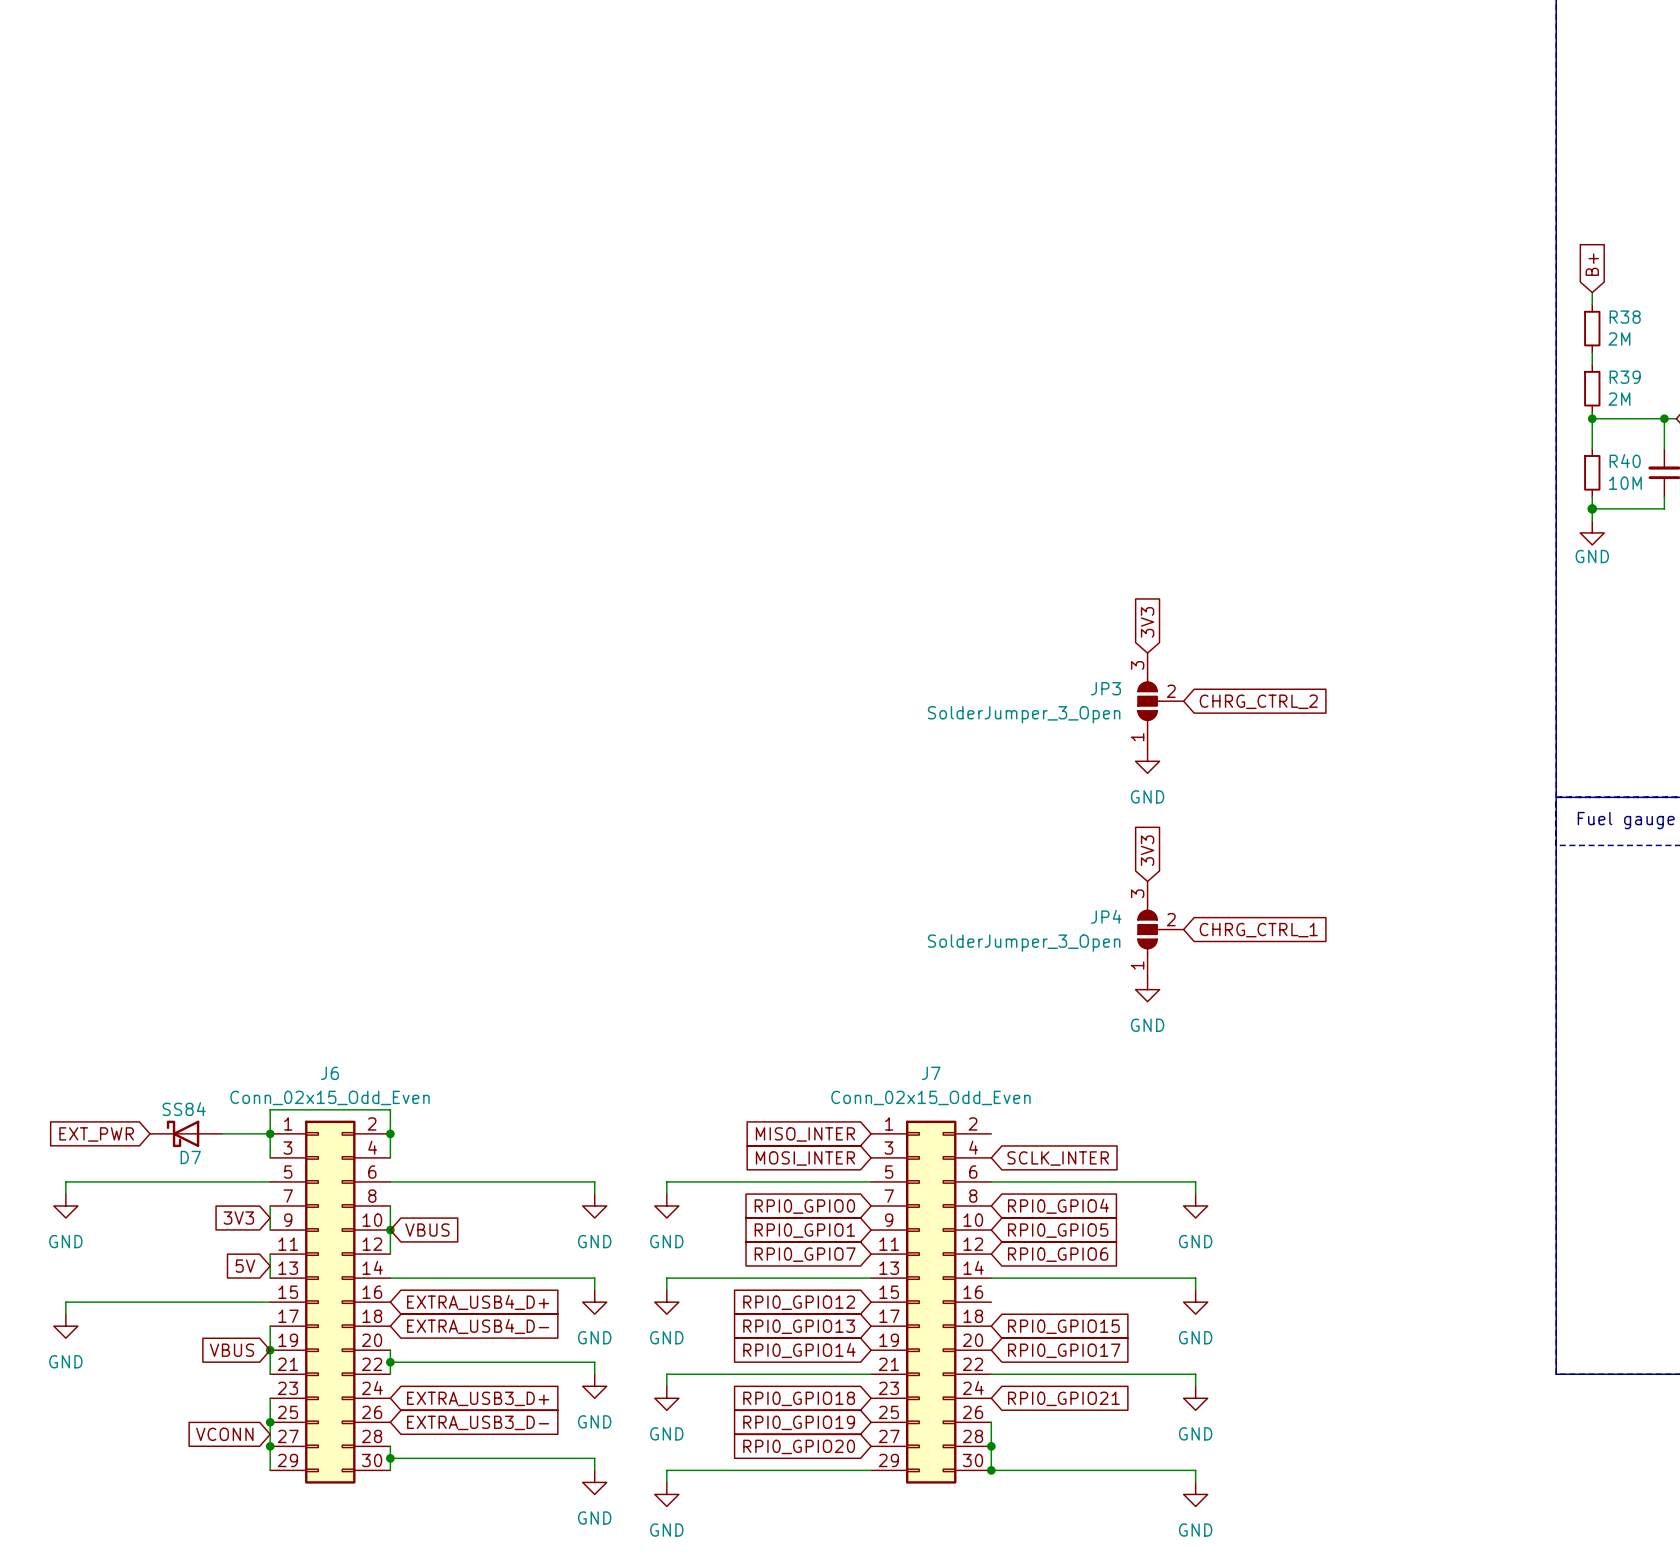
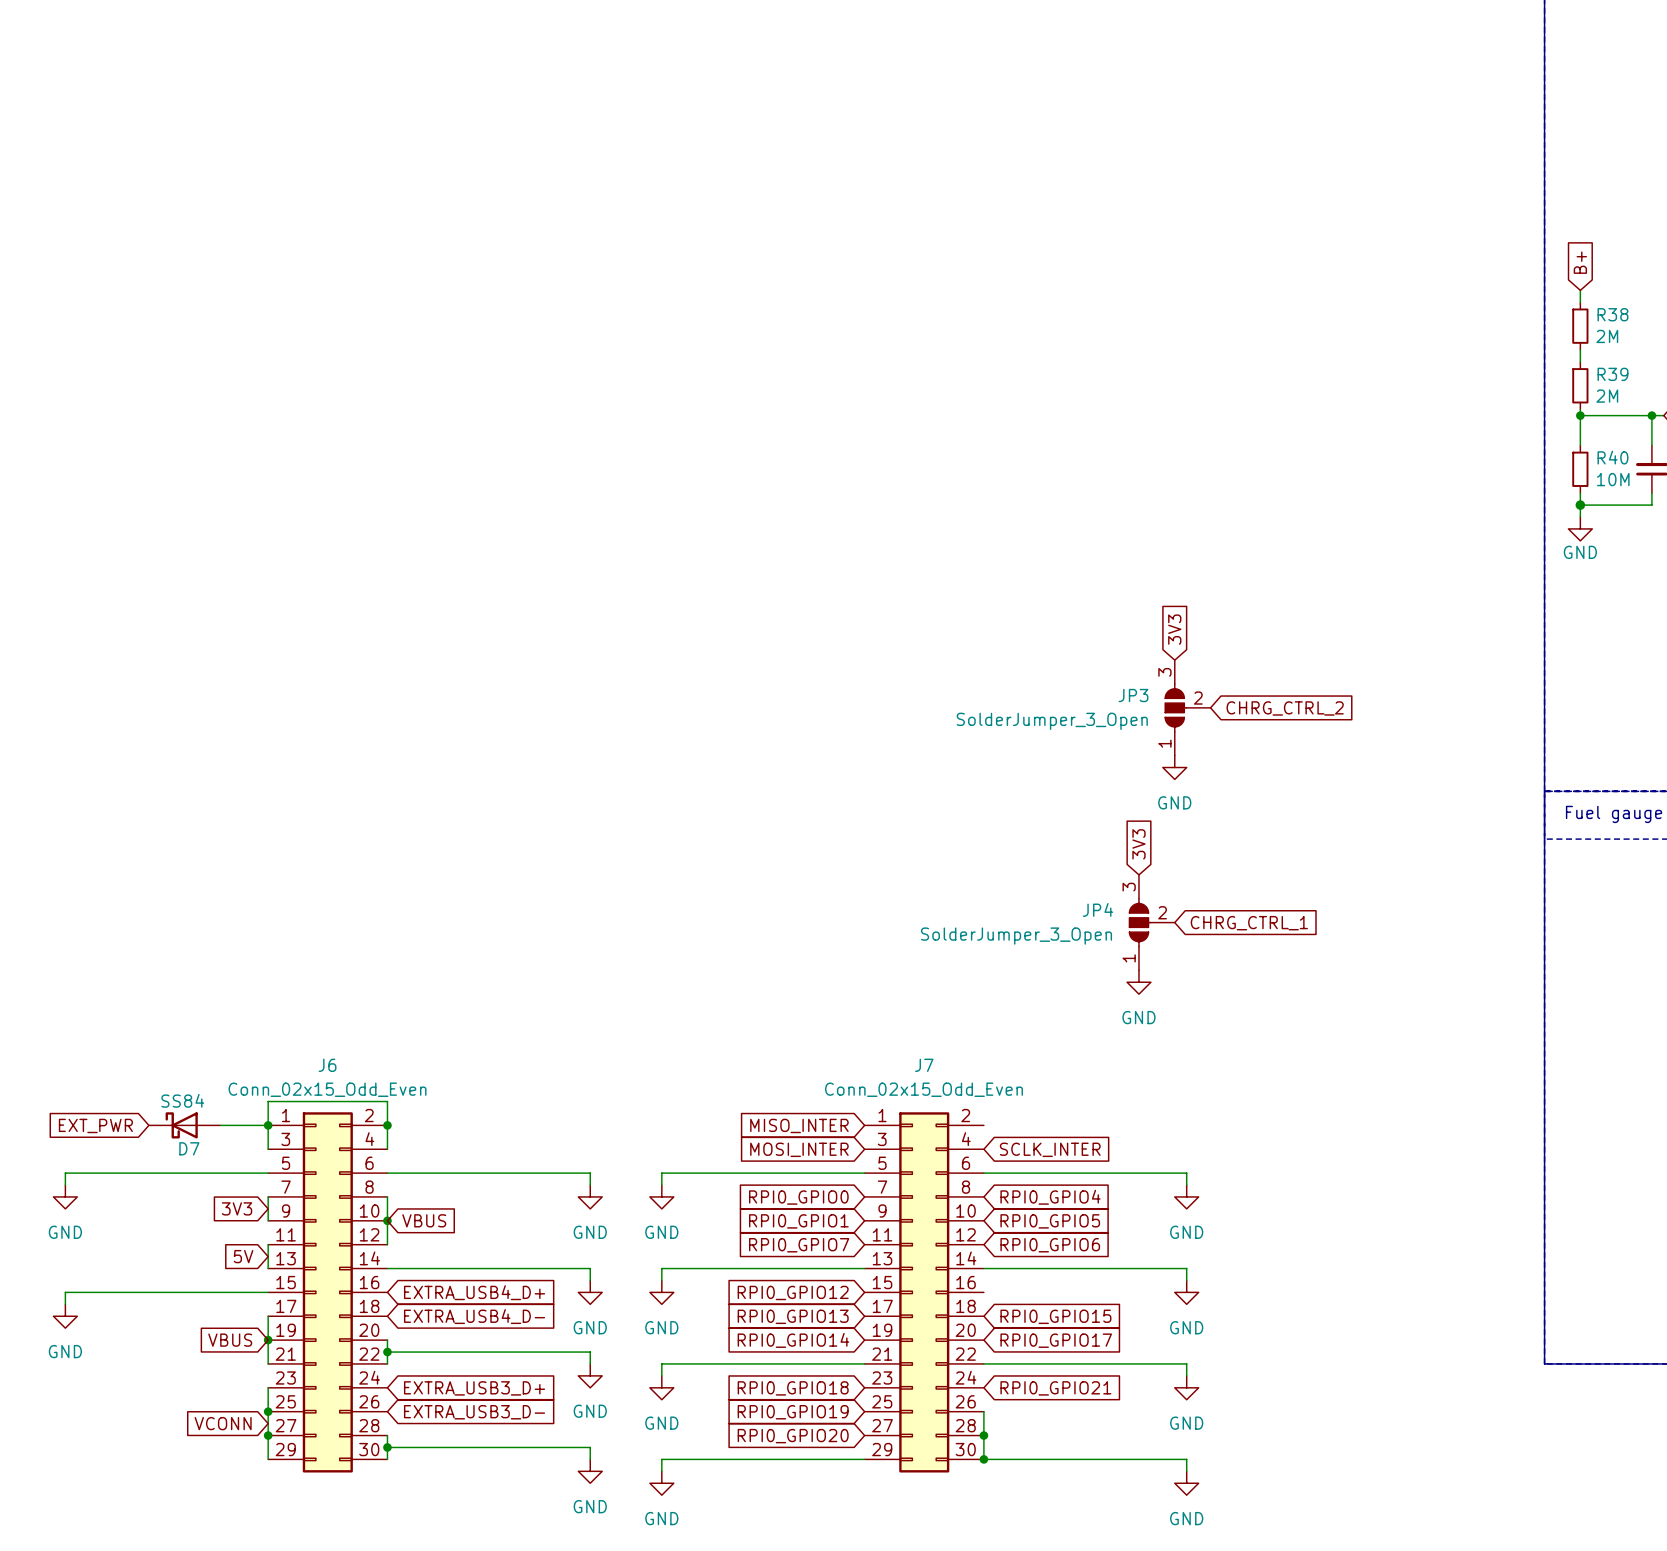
global label position: 3V3 (1147, 622) -> 3V3 (1174, 629)
JP3 position: (1160, 701) -> (1187, 707)
global label position: CHRG_CTRL_2 (1258, 701) -> CHRG_CTRL_2 (1285, 708)
power symbol position: GND (1147, 761) -> GND (1174, 767)

